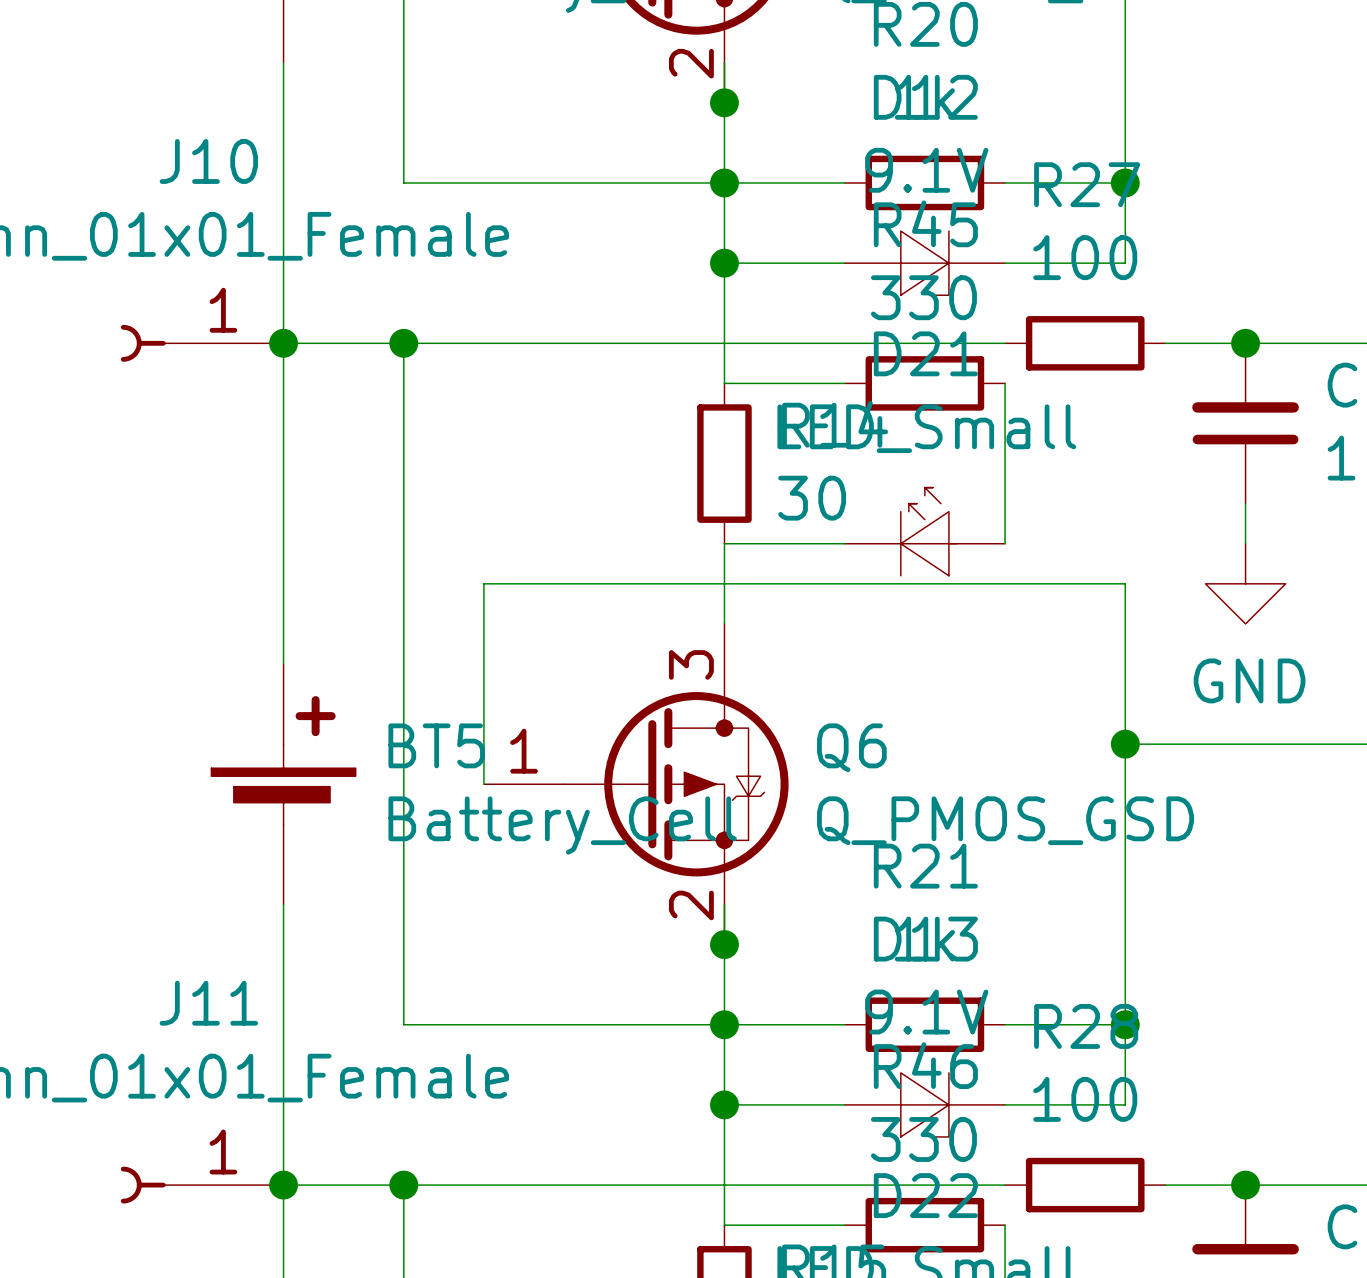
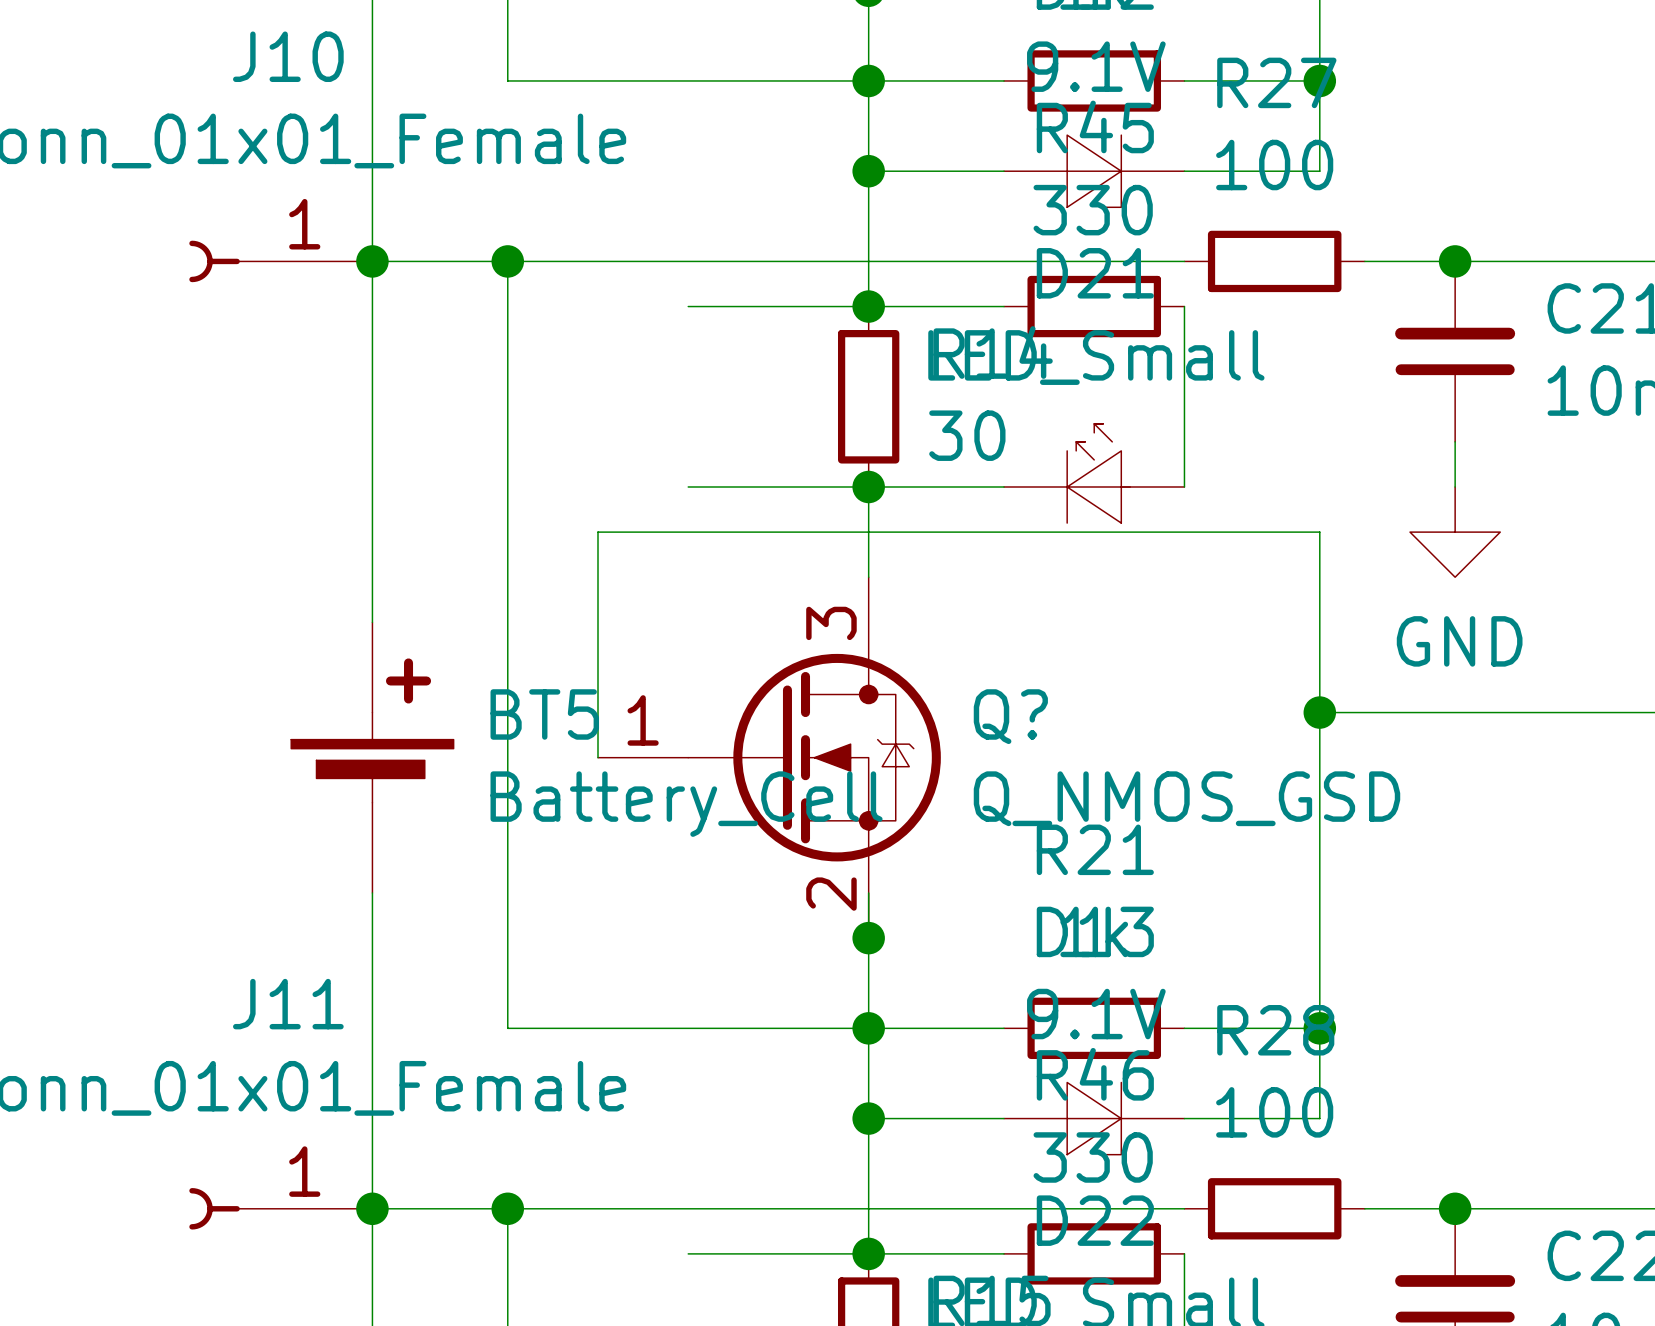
wire: none -> (688, 306) (868, 306)
junction: none -> (868, 306)
wire: none -> (688, 486) (868, 486)
junction: none -> (868, 486)
Q6: Q_PMOS_GSD (636, 784) -> none
Q?: none -> Q_NMOS_GSD (769, 757)
wire: none -> (688, 1253) (868, 1253)
junction: none -> (868, 1253)

